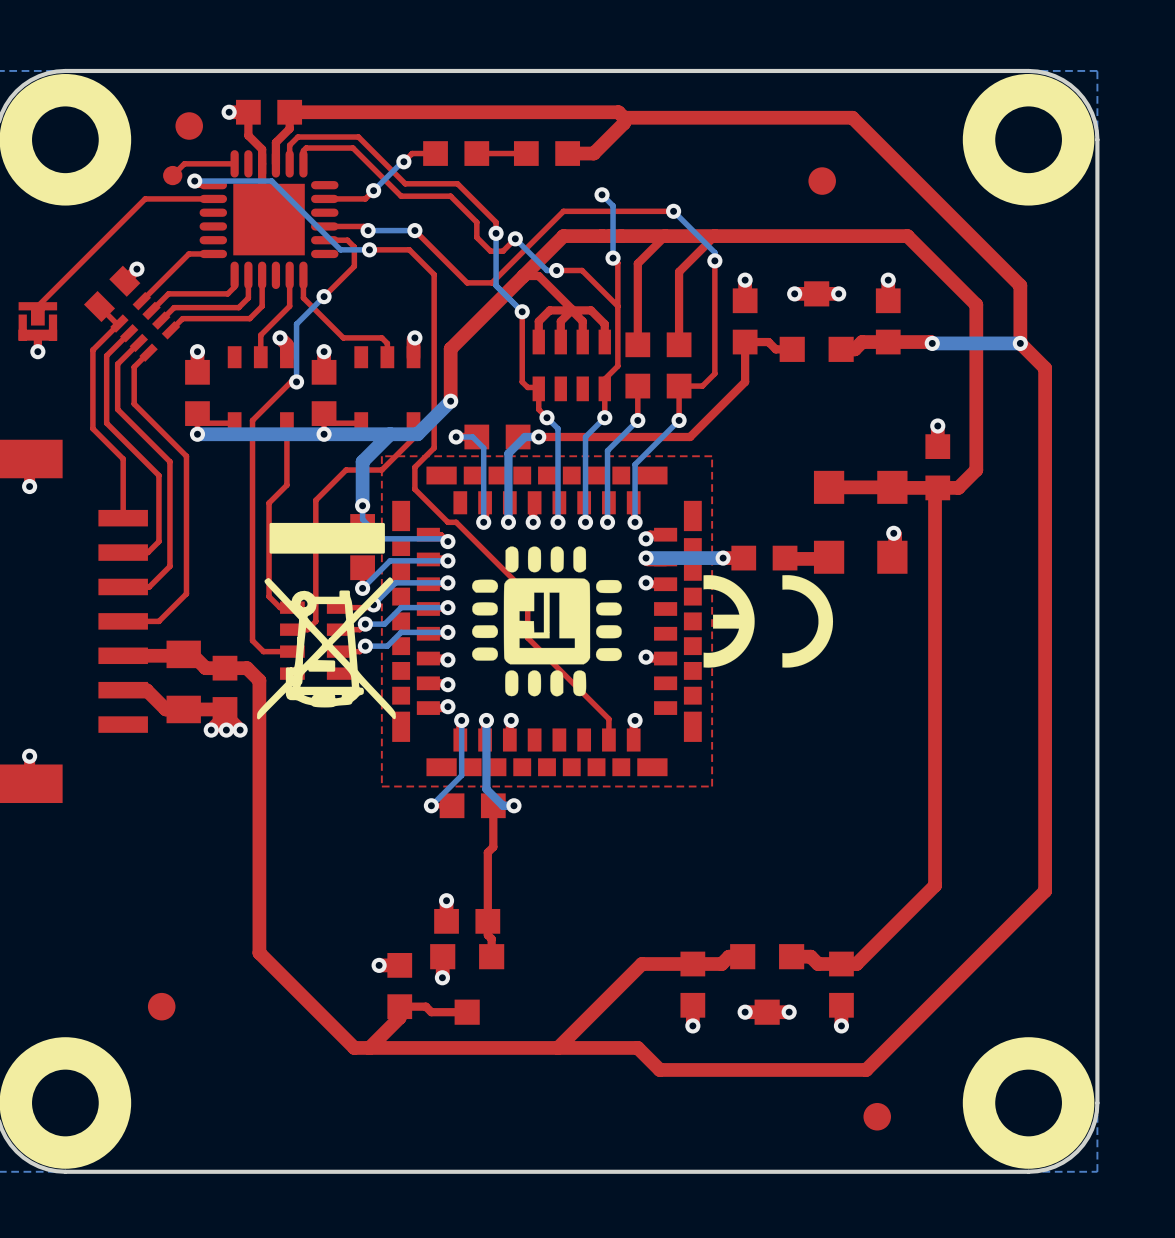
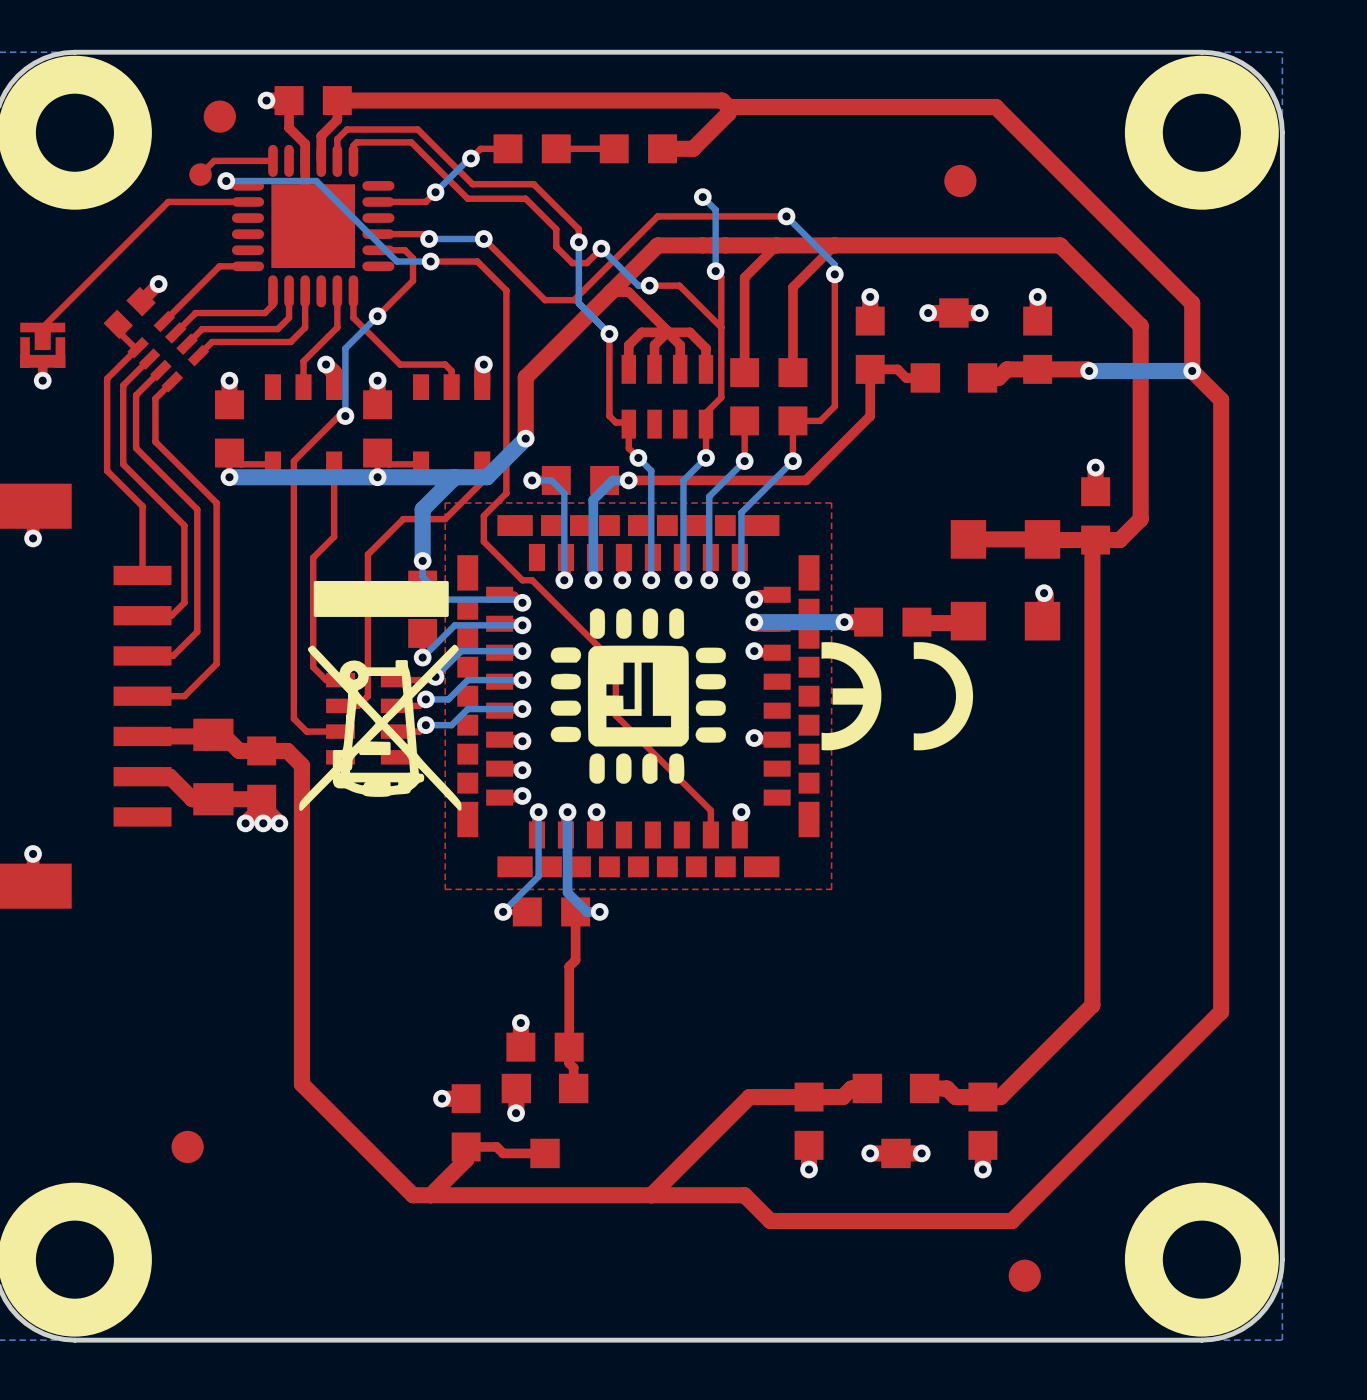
part footprint: [83, 265, 141, 323] -> [103, 286, 156, 340]

